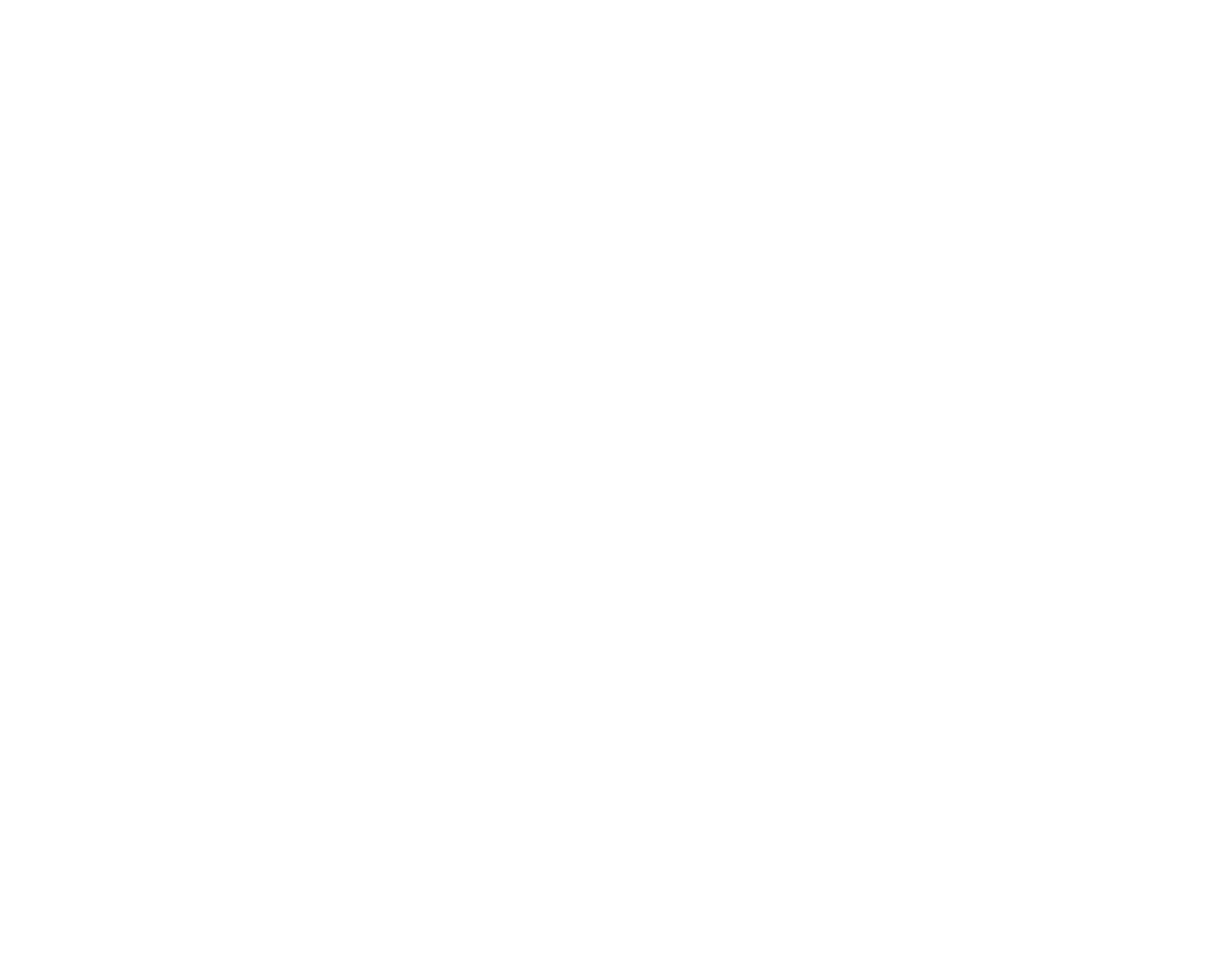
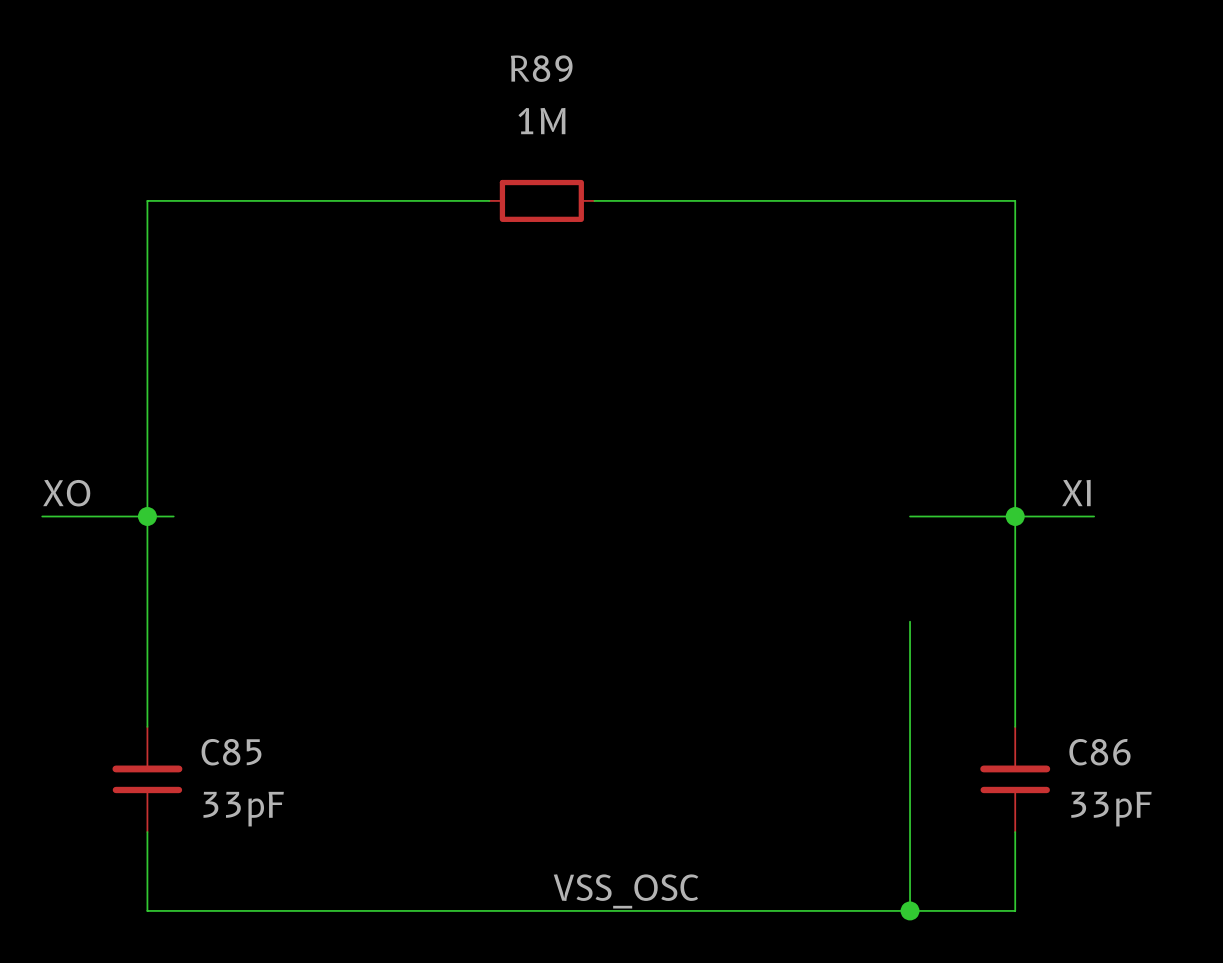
wire: none -> (489, 200) (147, 200) (147, 726)
R89: none -> (541, 200)
wire: none -> (594, 200) (1015, 200) (1015, 726)
label: none -> XO (66, 493)
label: none -> XI (1076, 493)
wire: none -> (42, 516) (173, 516)
junction: none -> (147, 516)
wire: none -> (910, 516) (1094, 516)
junction: none -> (1015, 516)
wire: none -> (910, 621) (910, 910)
C85: none -> (147, 779)
C86: none -> (1015, 779)
wire: none -> (147, 832) (147, 910) (1015, 910) (1015, 832)
label: none -> VSS_OSC (626, 891)
junction: none -> (910, 910)

